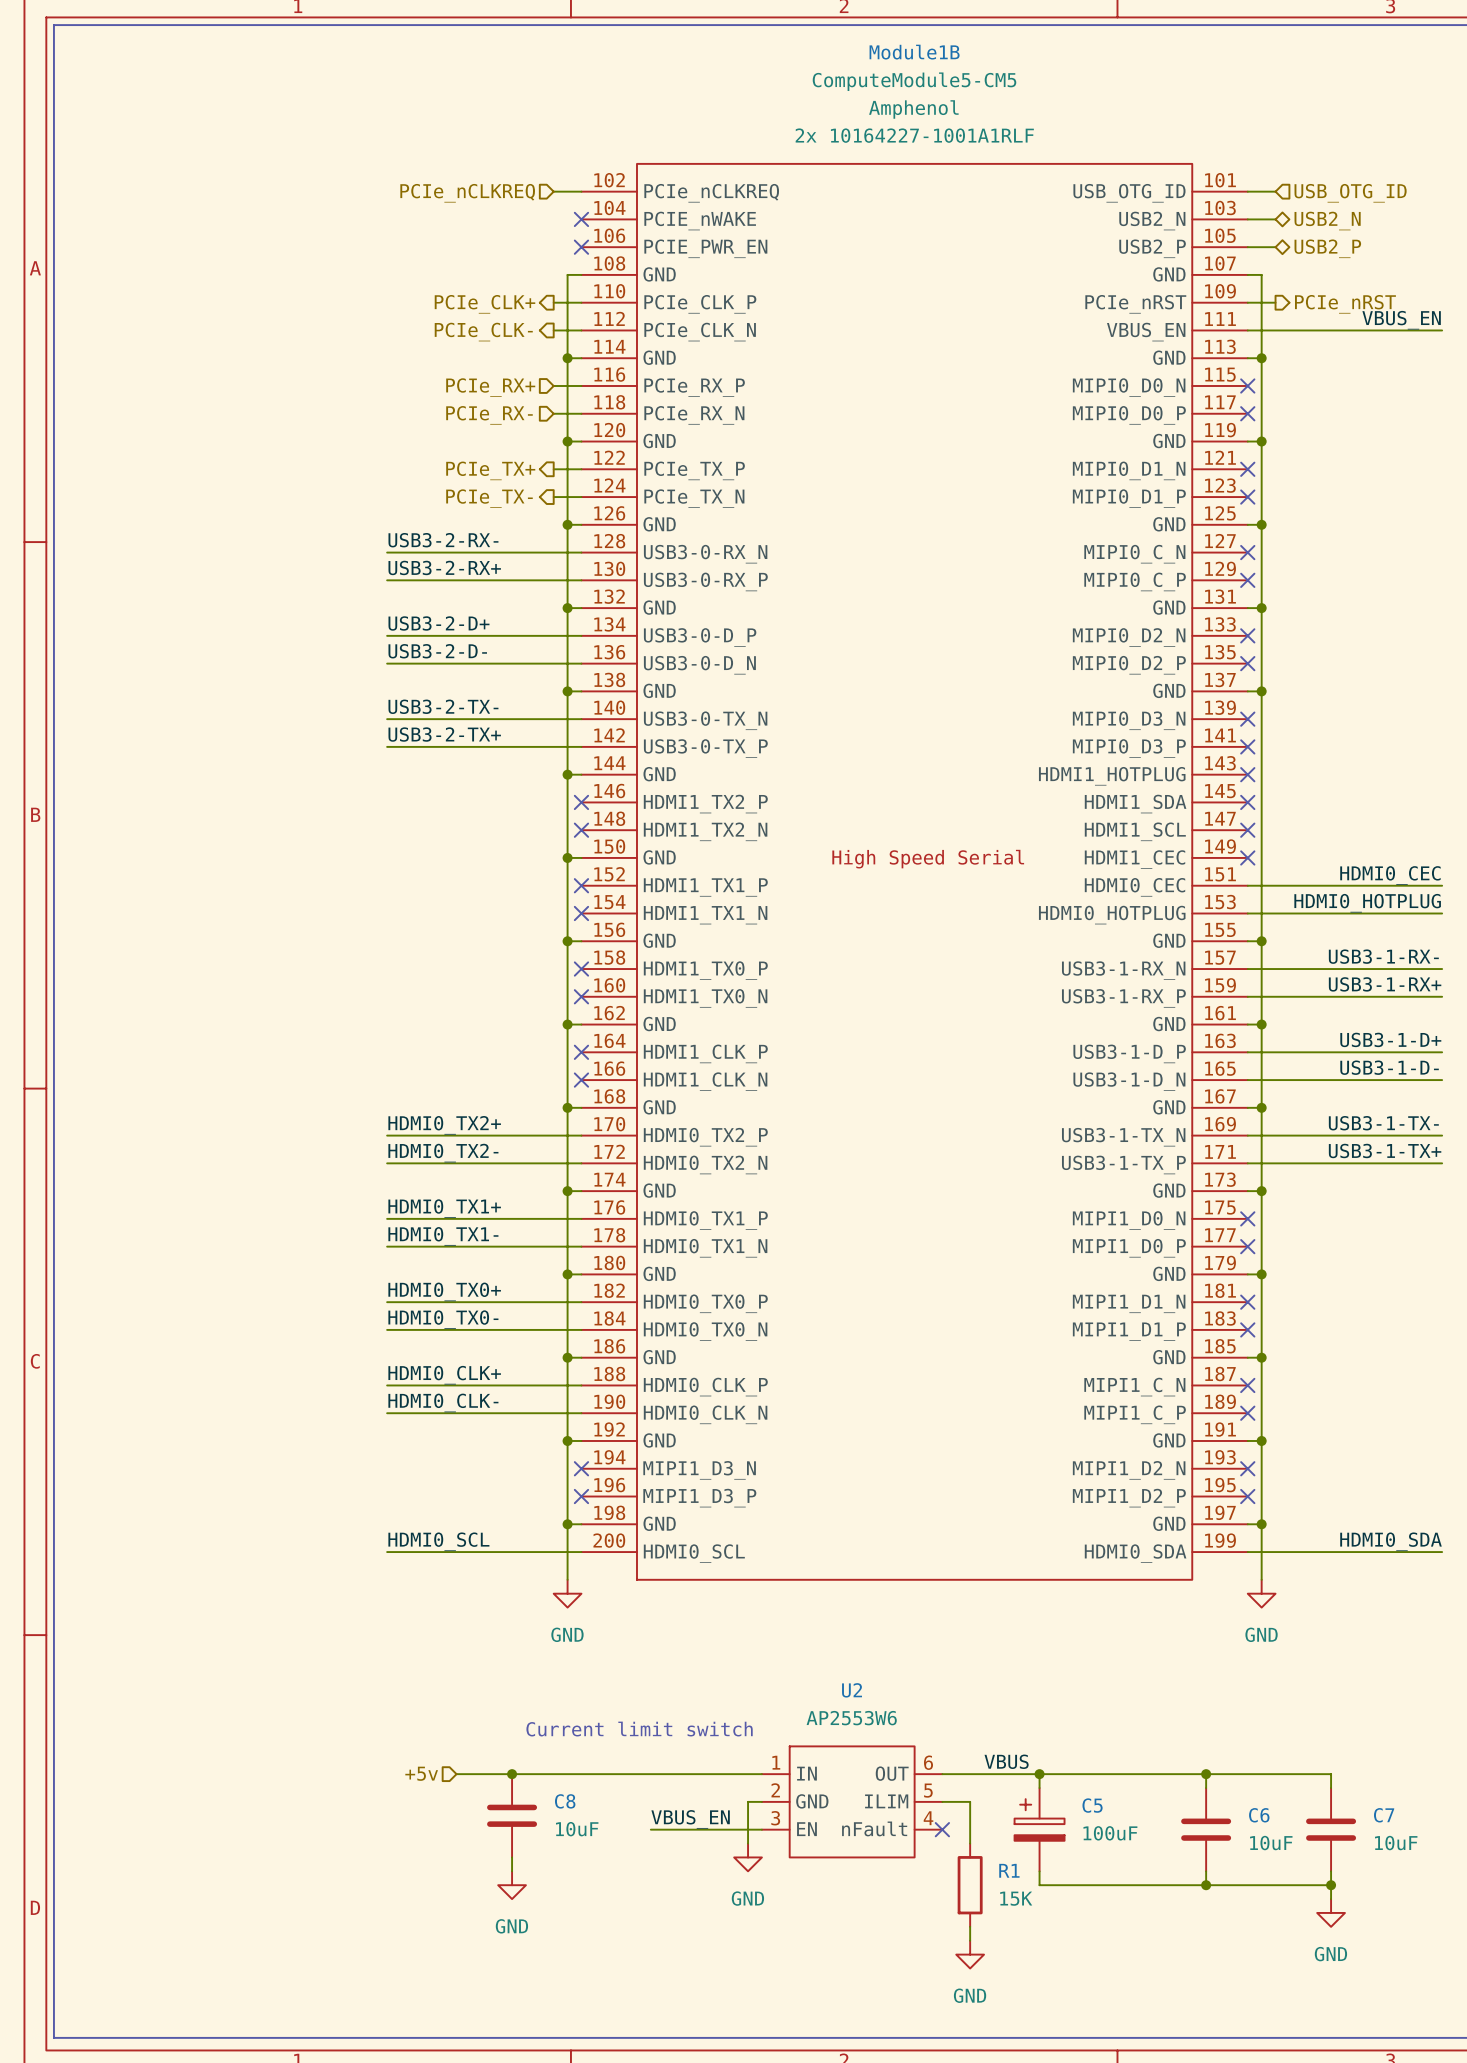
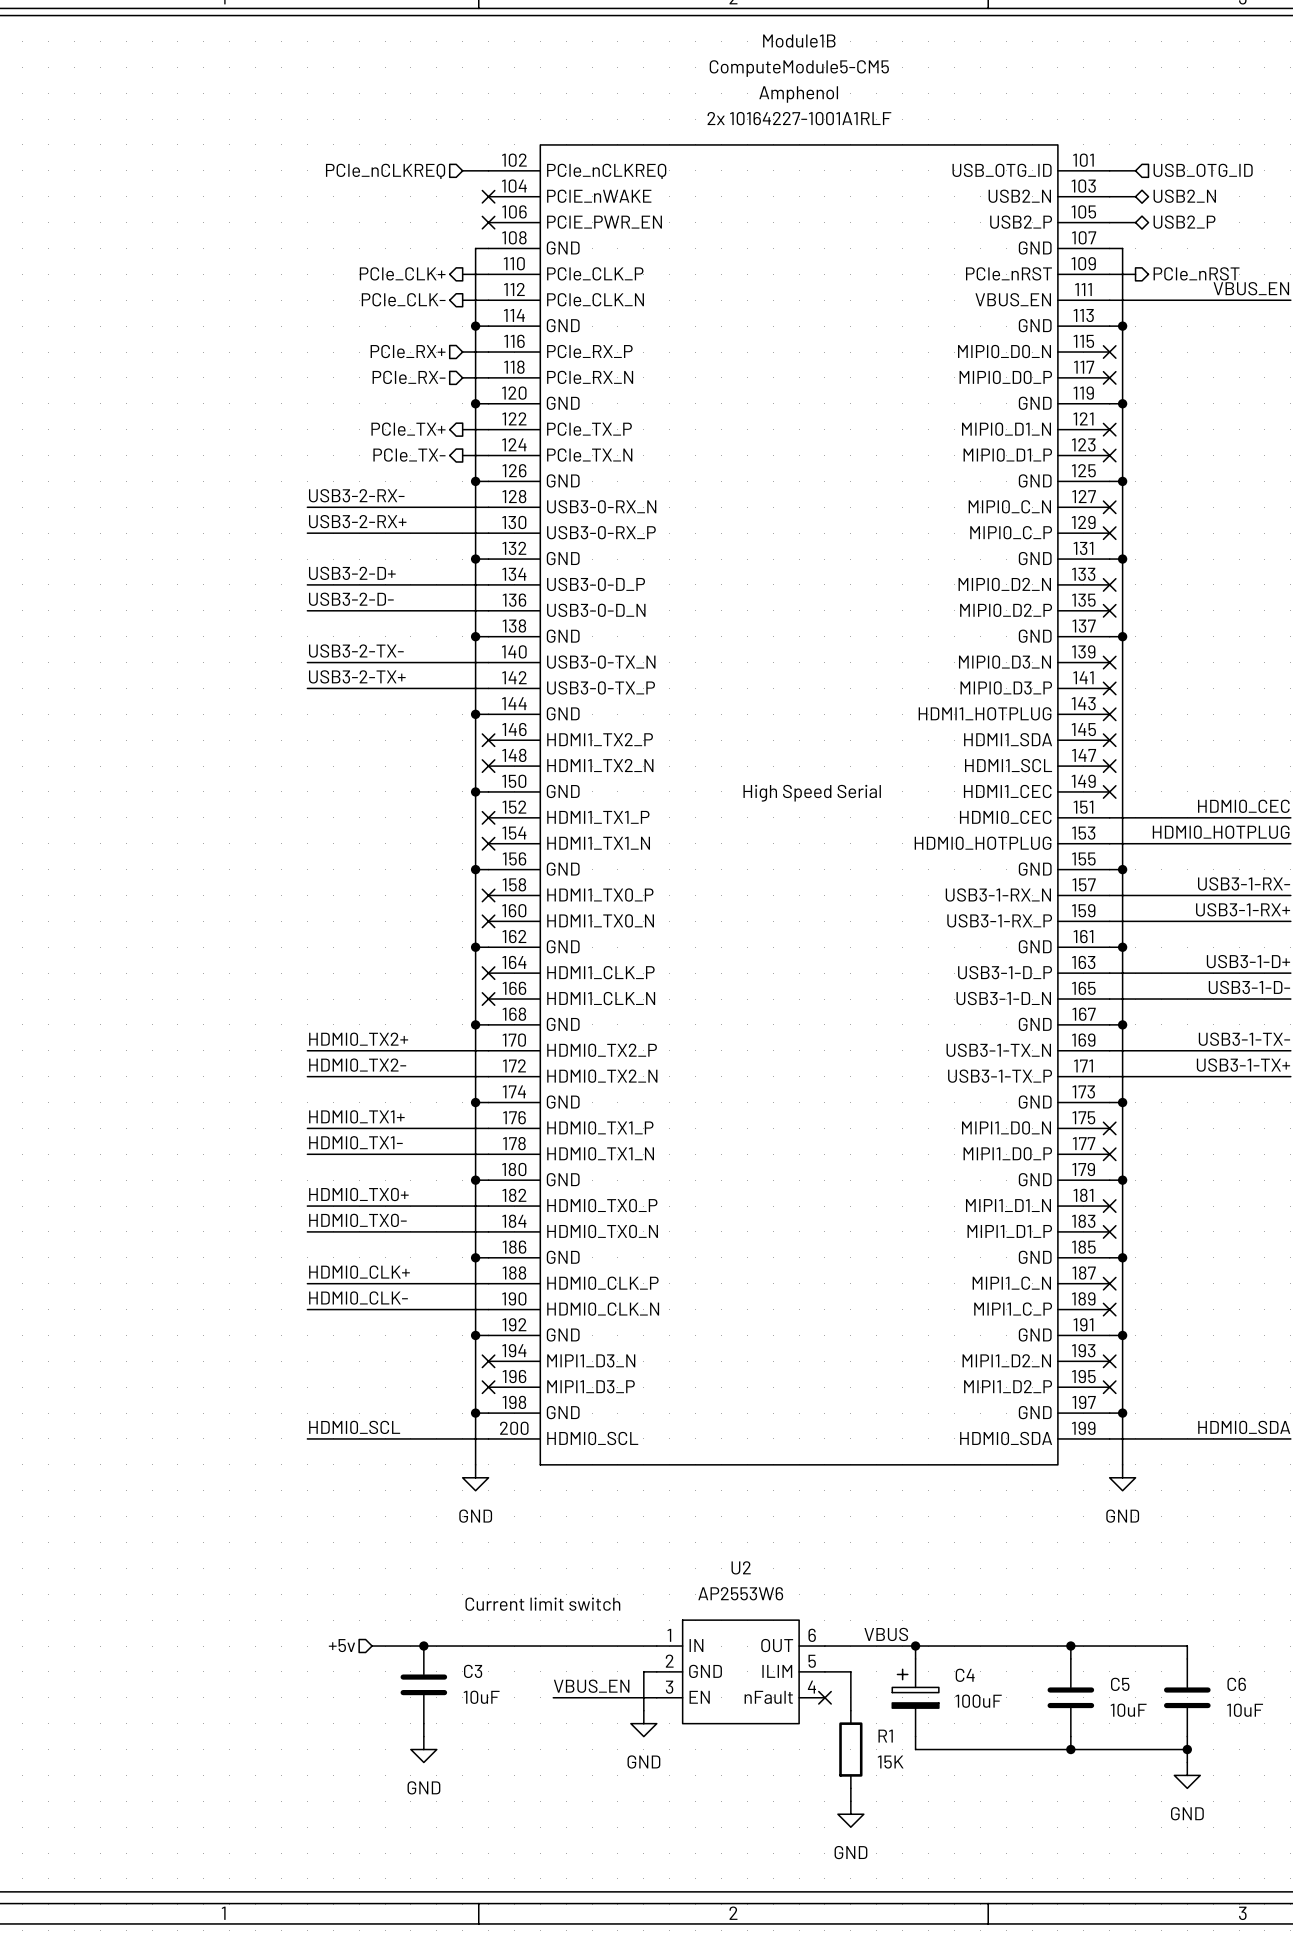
C8 name: C8 (565, 1801) -> C3 (473, 1671)
C5 name: C5 (1092, 1805) -> C4 (965, 1675)
C6 name: C6 (1259, 1815) -> C5 (1120, 1684)
C7 name: C7 (1384, 1815) -> C6 (1236, 1684)

